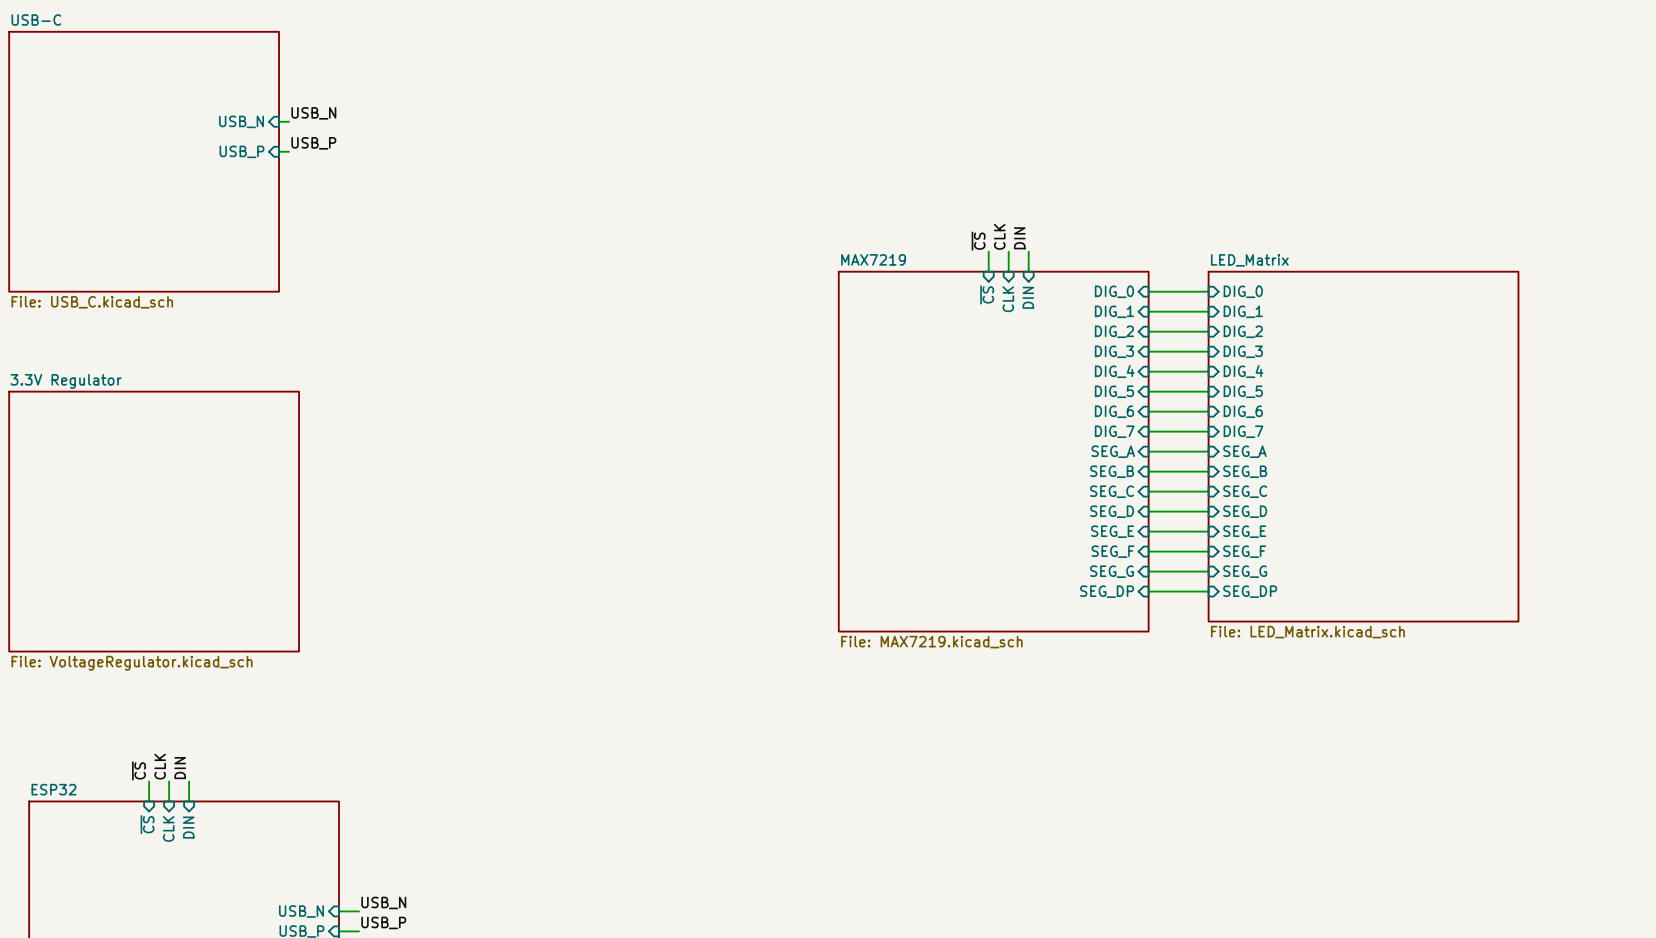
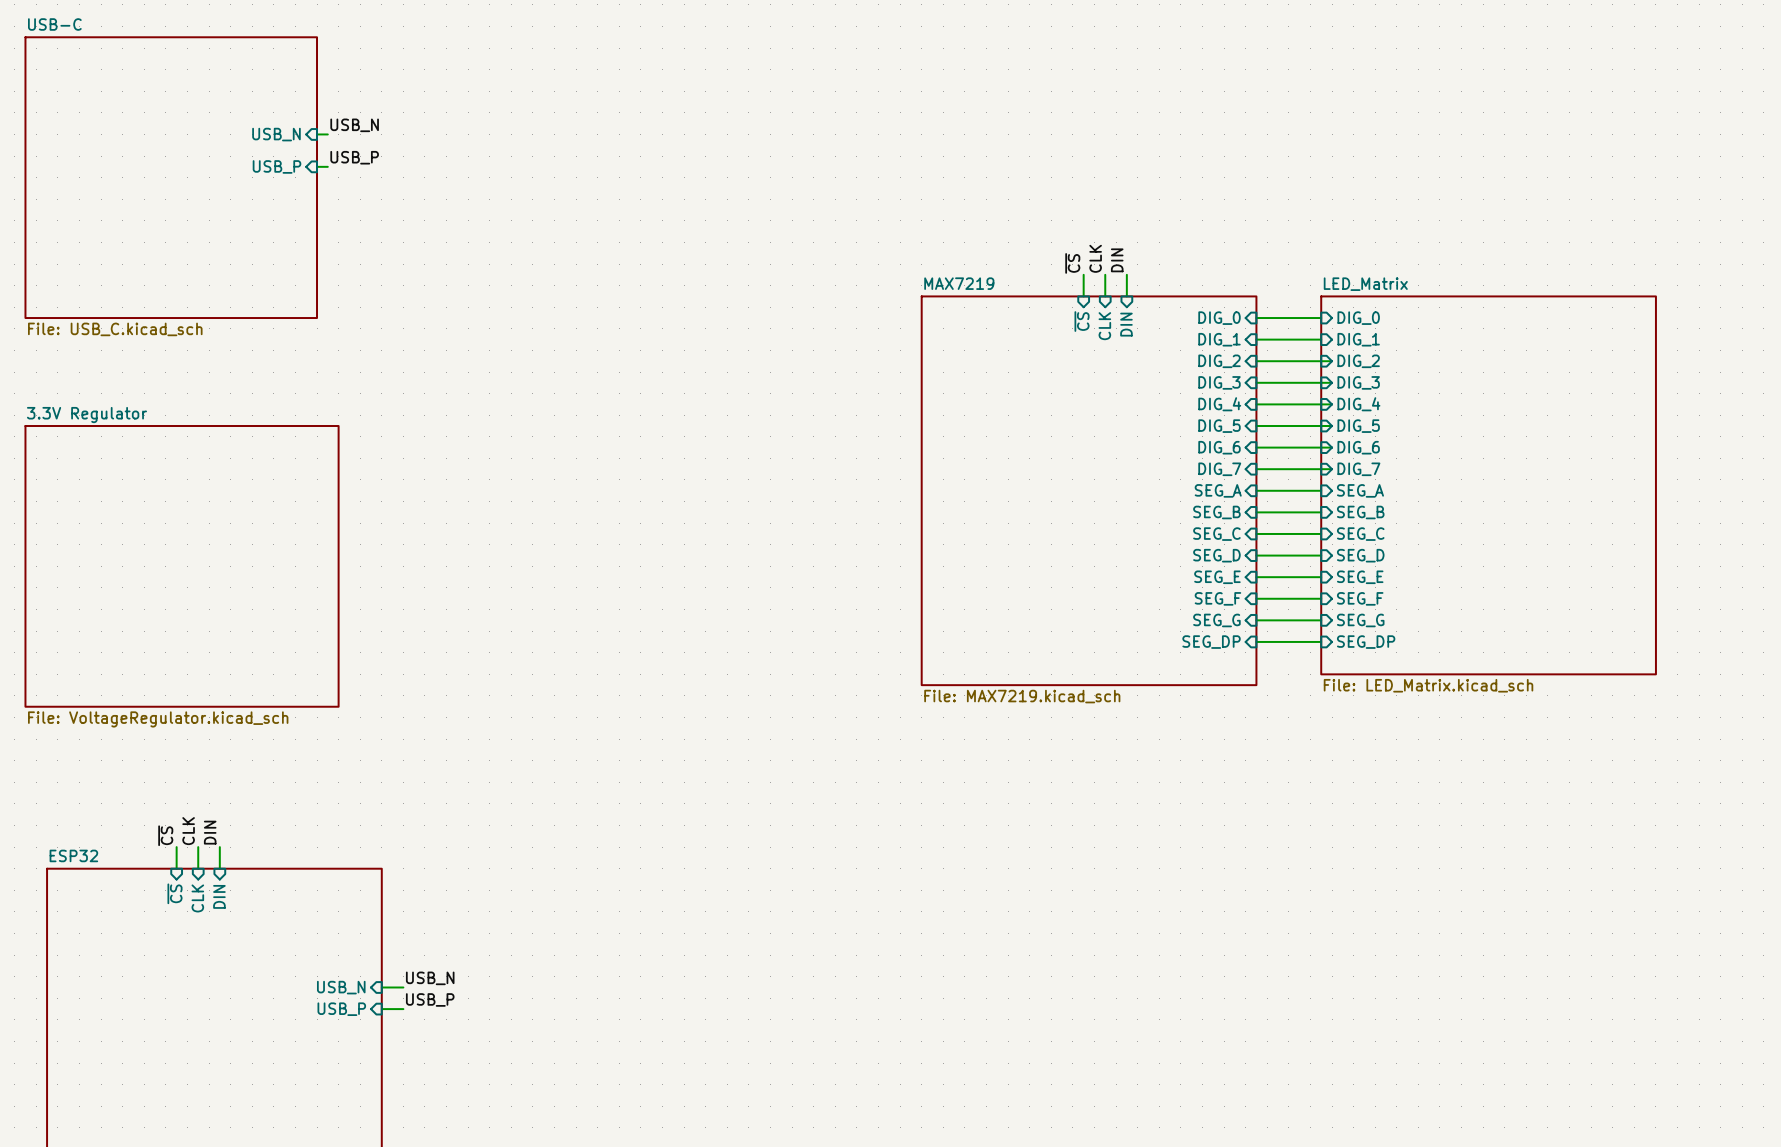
wire: none -> (1321, 361) (1332, 361)
wire: none -> (1321, 382) (1332, 382)
wire: none -> (1321, 404) (1332, 404)
wire: none -> (1321, 425) (1332, 425)
wire: none -> (1321, 447) (1332, 447)
wire: none -> (1321, 469) (1332, 469)

